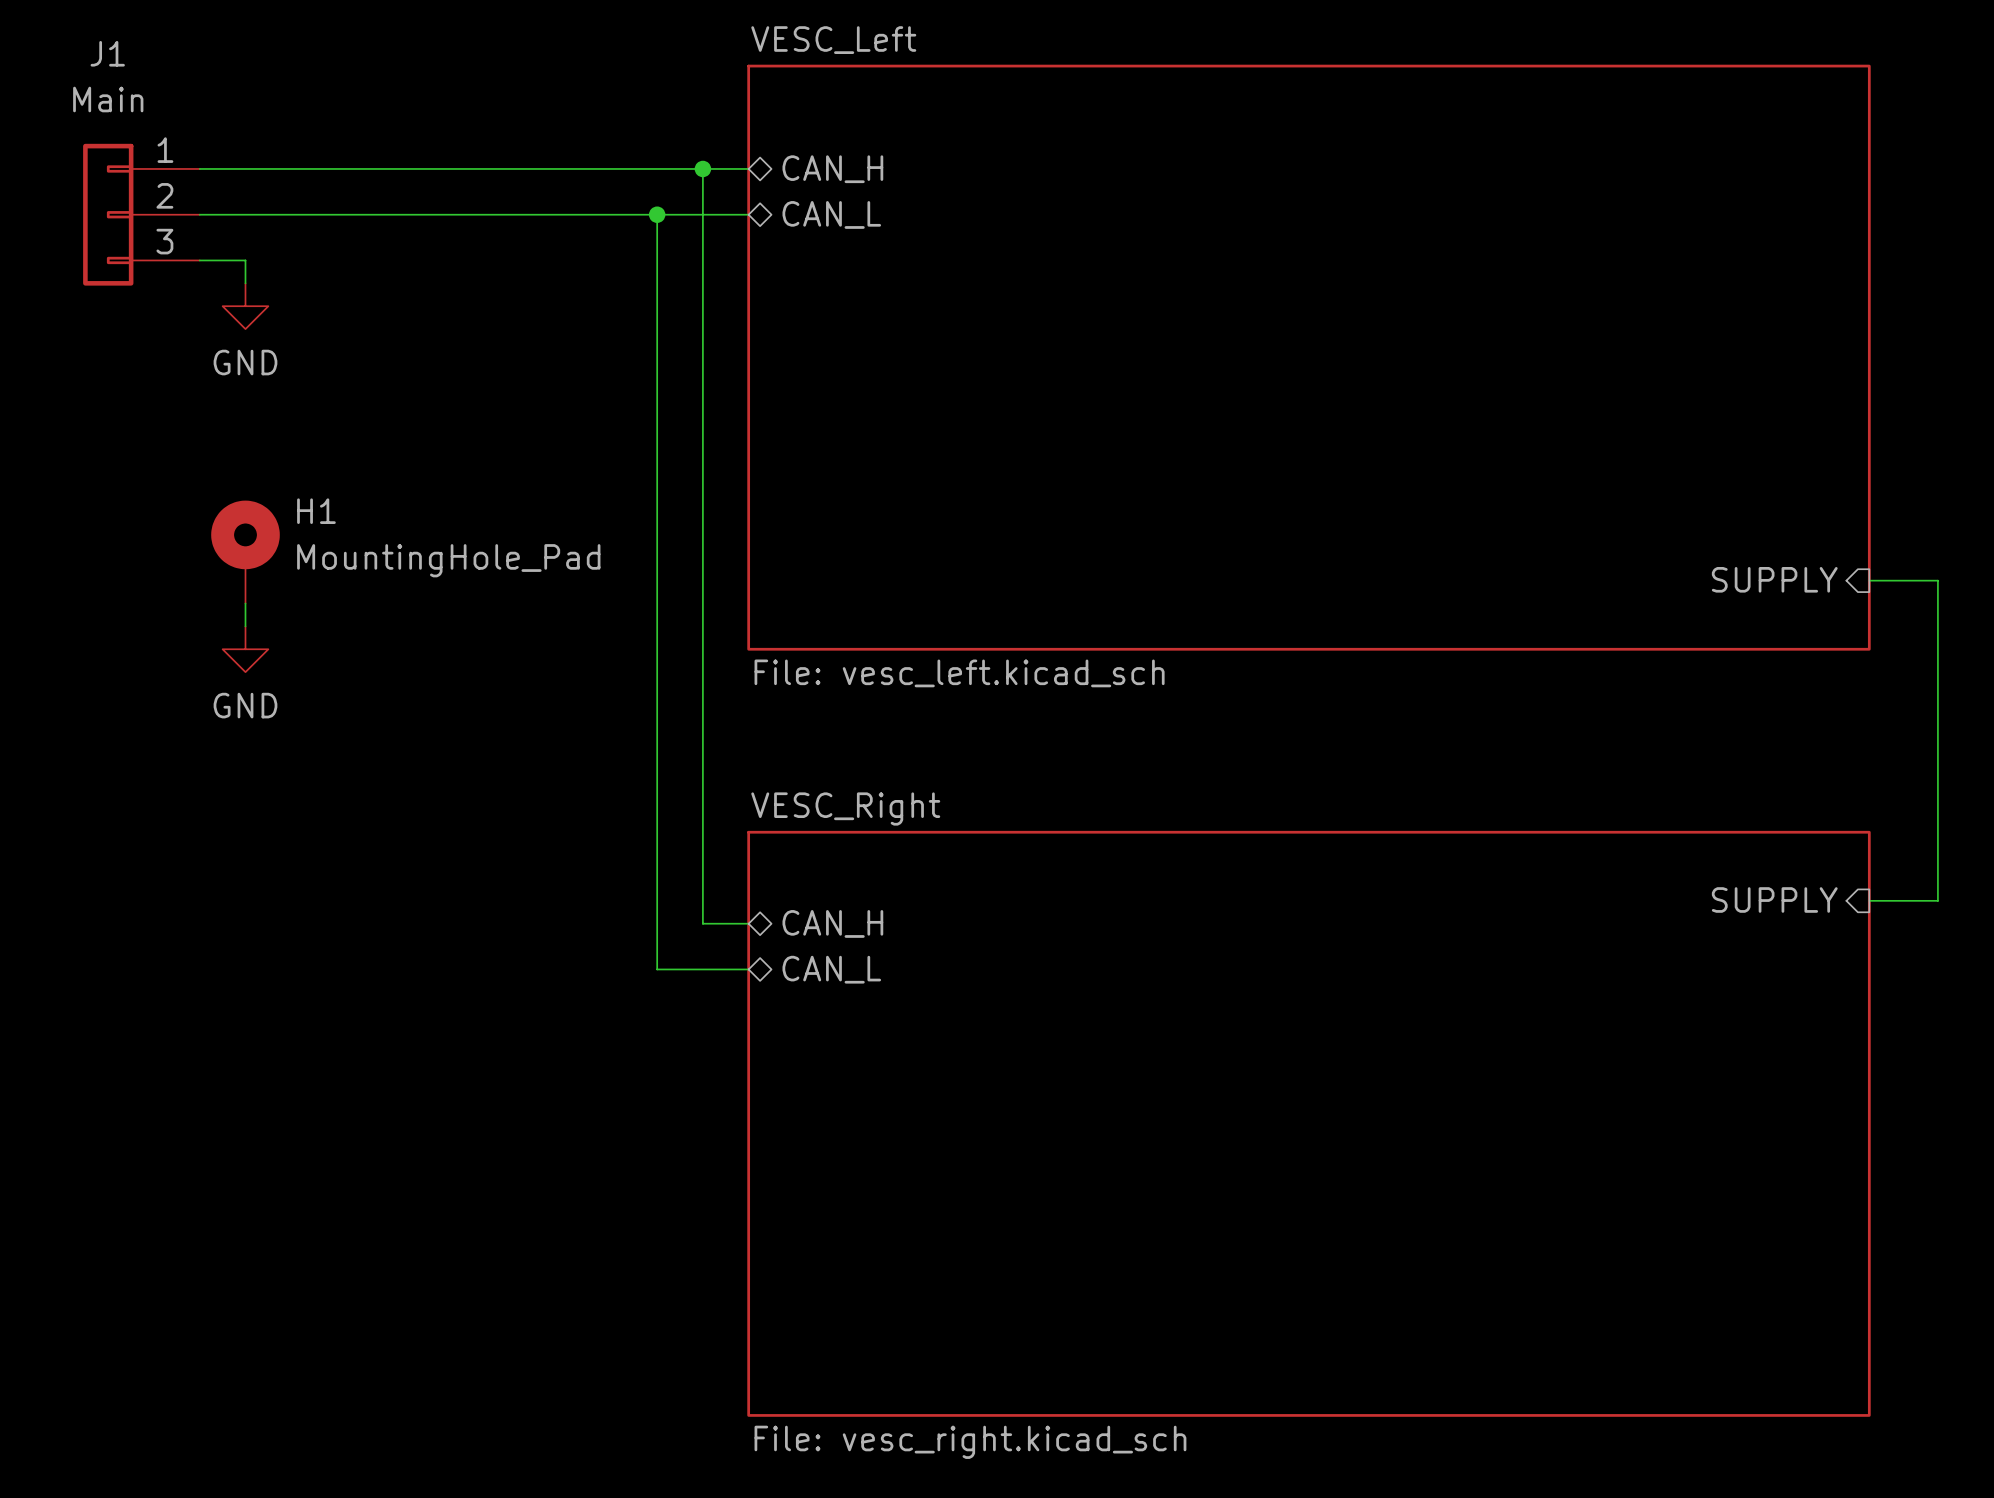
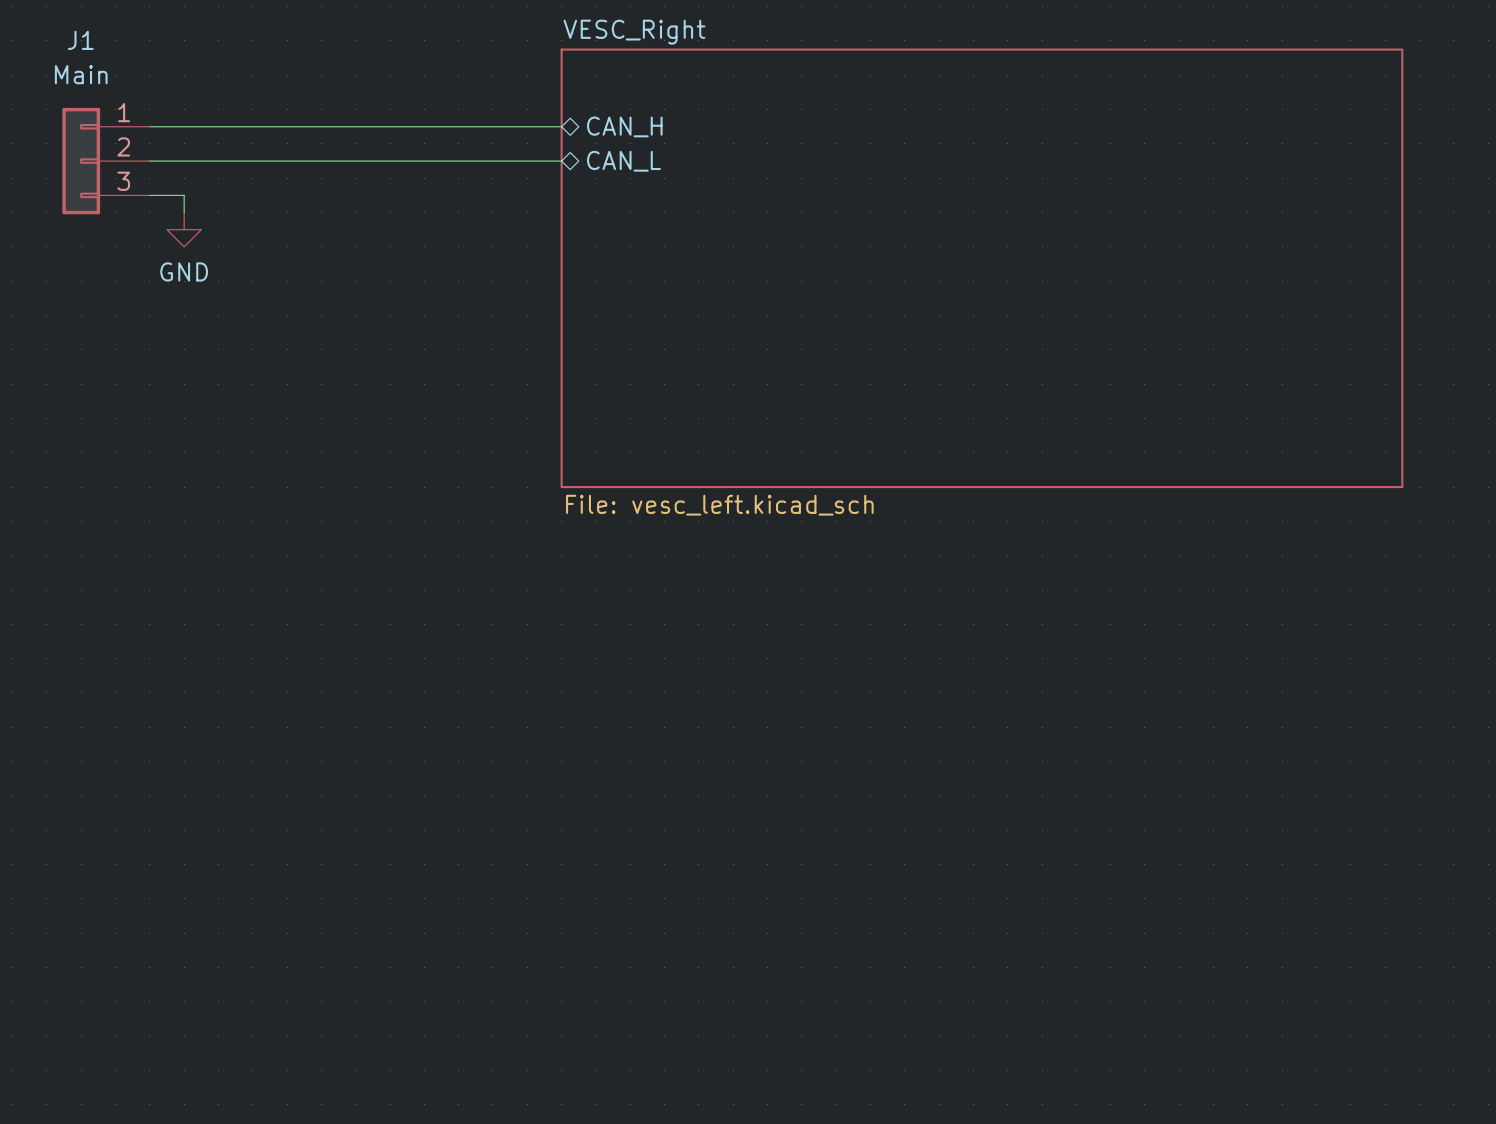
sheet VESC_Left name: VESC_Left (833, 40) -> VESC_Right (634, 32)
wire: (702, 168) (702, 923) (748, 923) -> none
junction: (702, 168) -> none
wire: (657, 214) (657, 969) (748, 969) -> none
junction: (657, 214) -> none
H1: MountingHole_Pad (245, 552) -> none
sheet pin: SUPPLY (1774, 579) -> none
wire: (1869, 580) (1937, 580) (1937, 900) (1869, 900) -> none
wire: (245, 603) (245, 626) -> none
power symbol: GND (245, 649) -> none
sheet pin: SUPPLY (1774, 899) -> none
sheet pin: CAN_H (832, 923) -> none
sheet pin: CAN_L (831, 969) -> none
sheet VESC_Right: File: vesc_right.kicad_sch (1308, 1123) -> none

